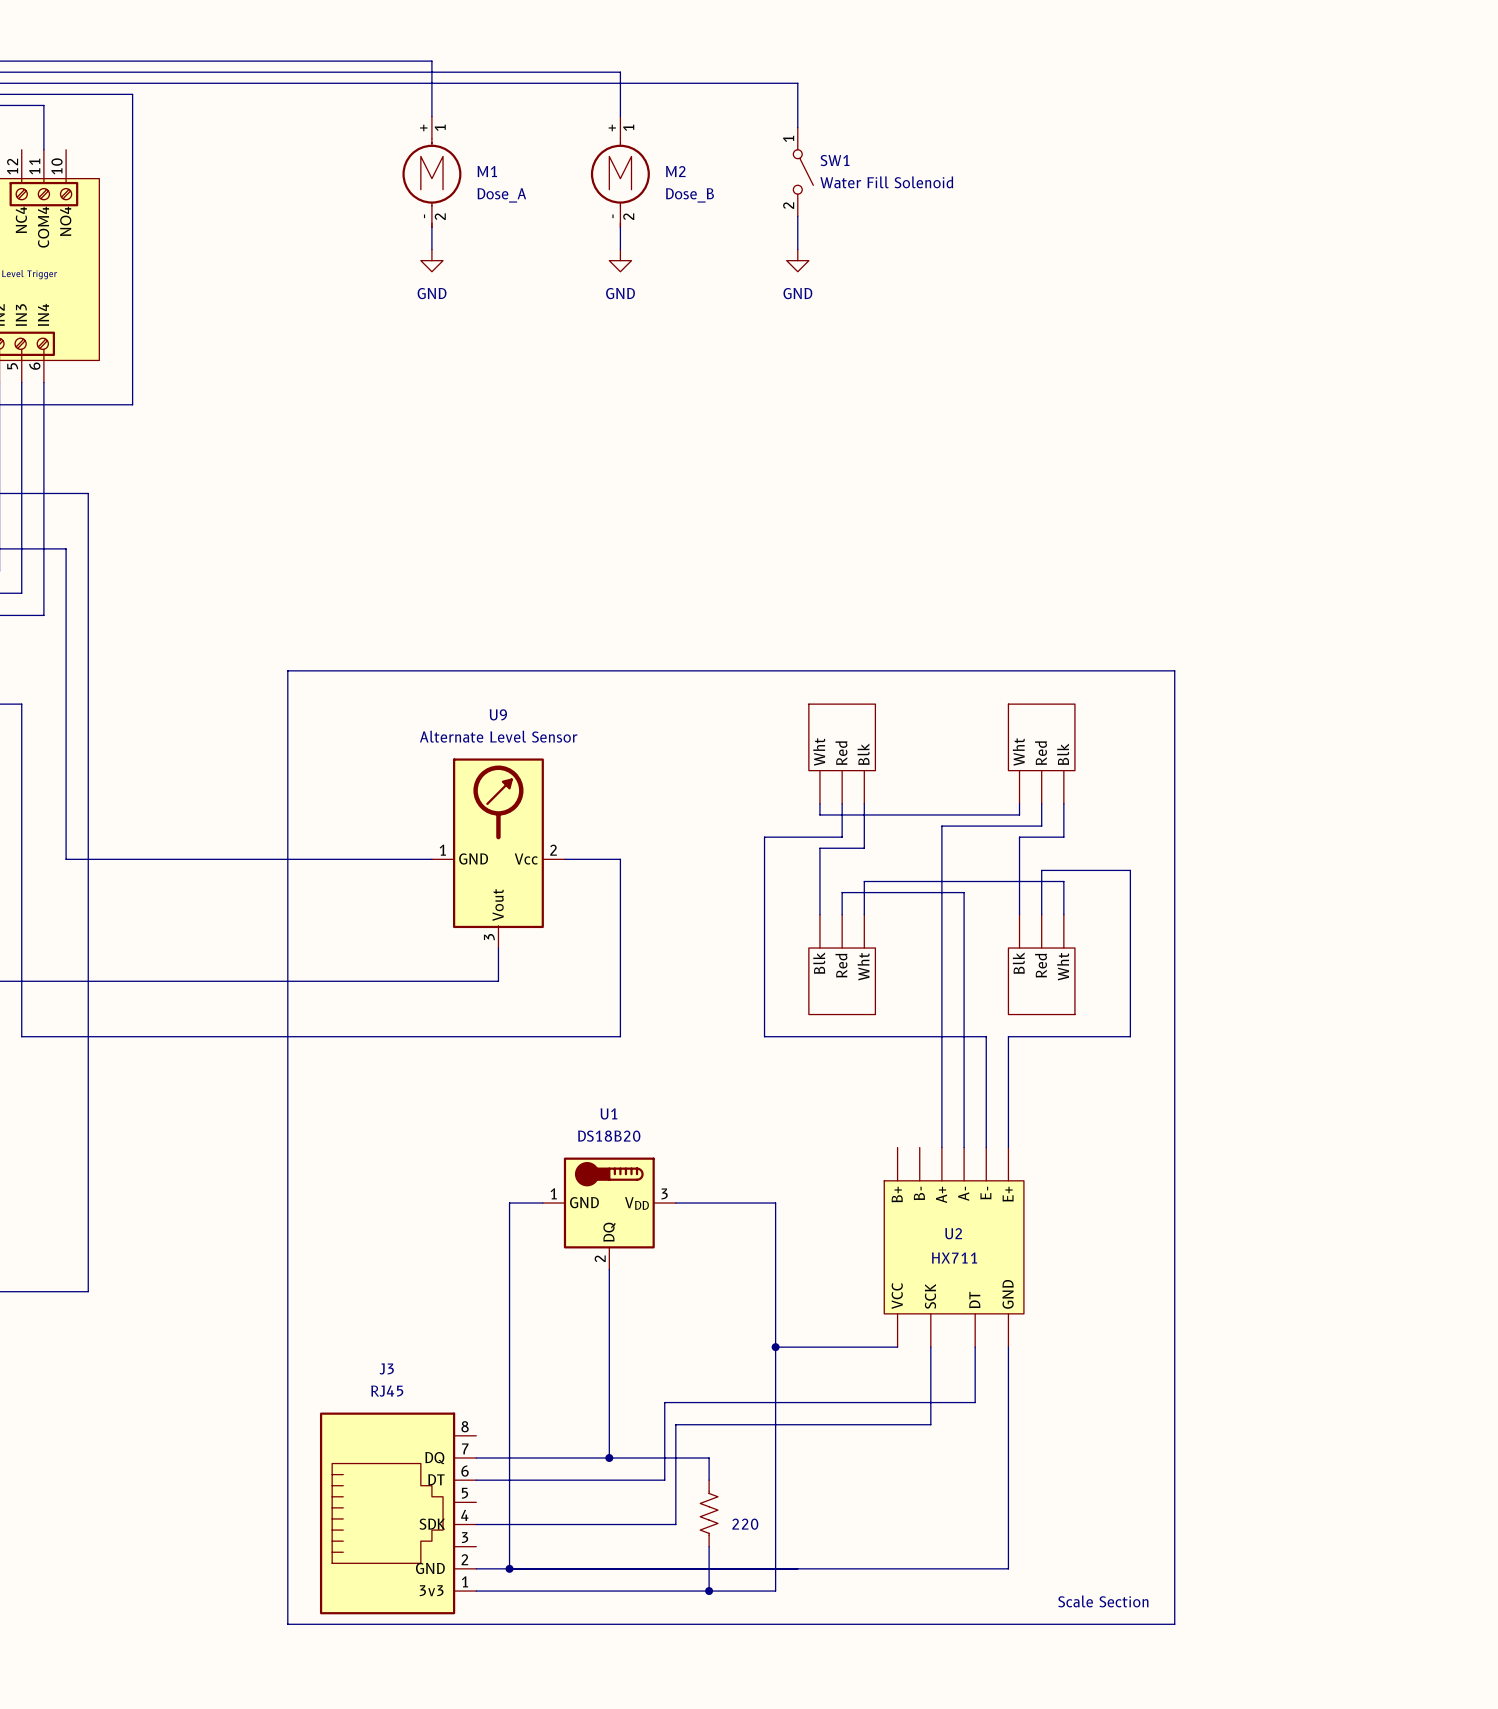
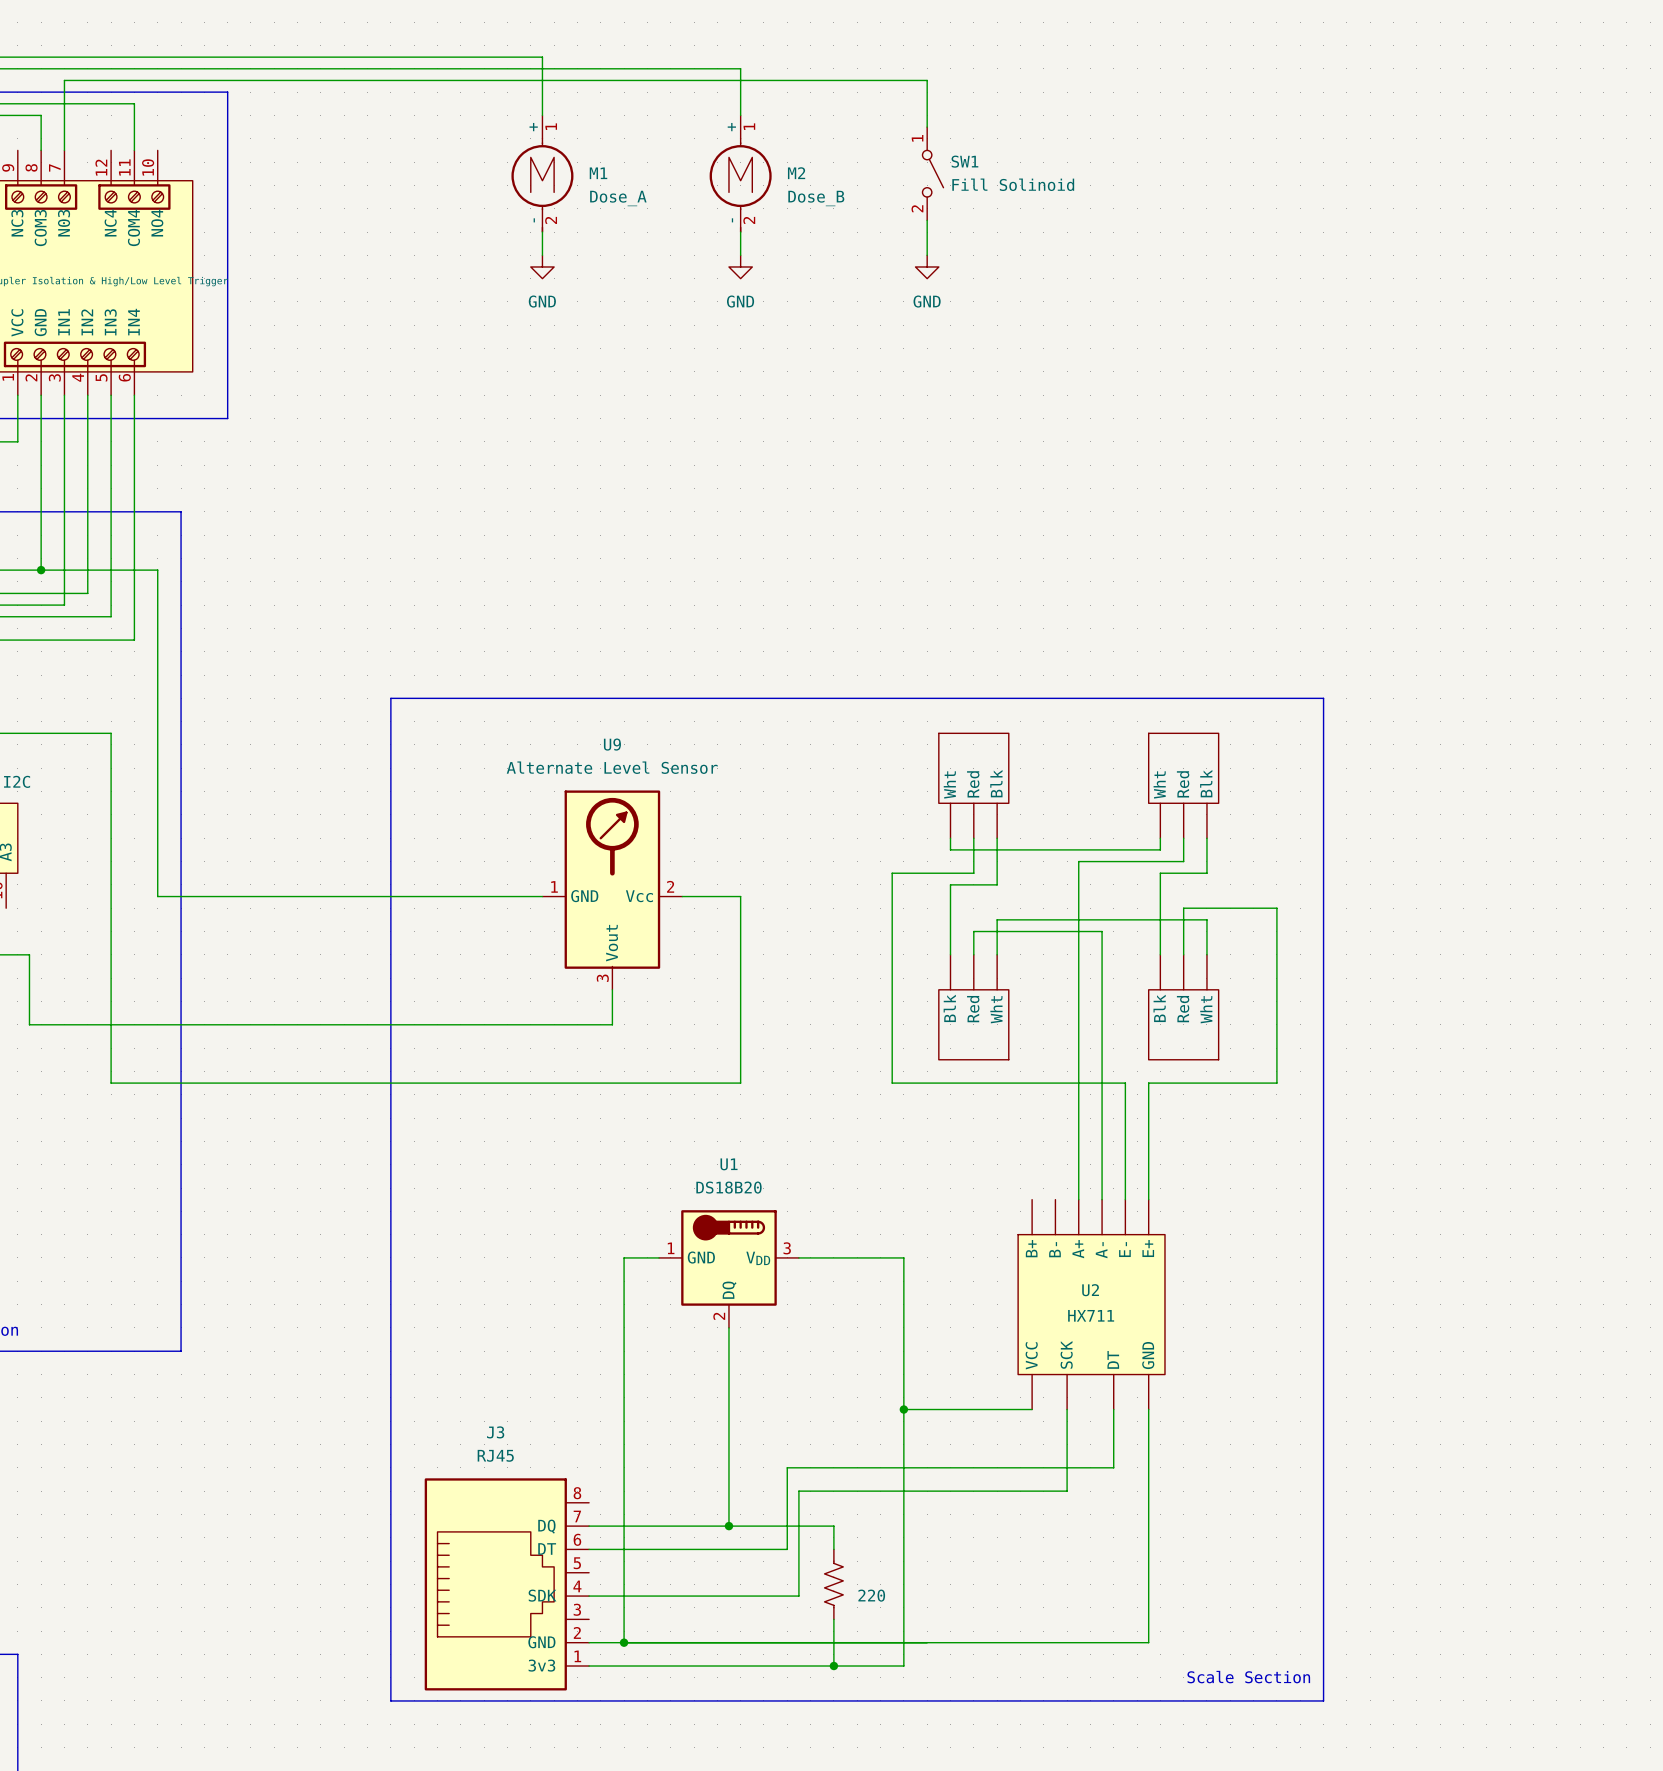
SW1 value: Water Fill Solenoid (886, 182) -> Fill Solinoid (1013, 184)

